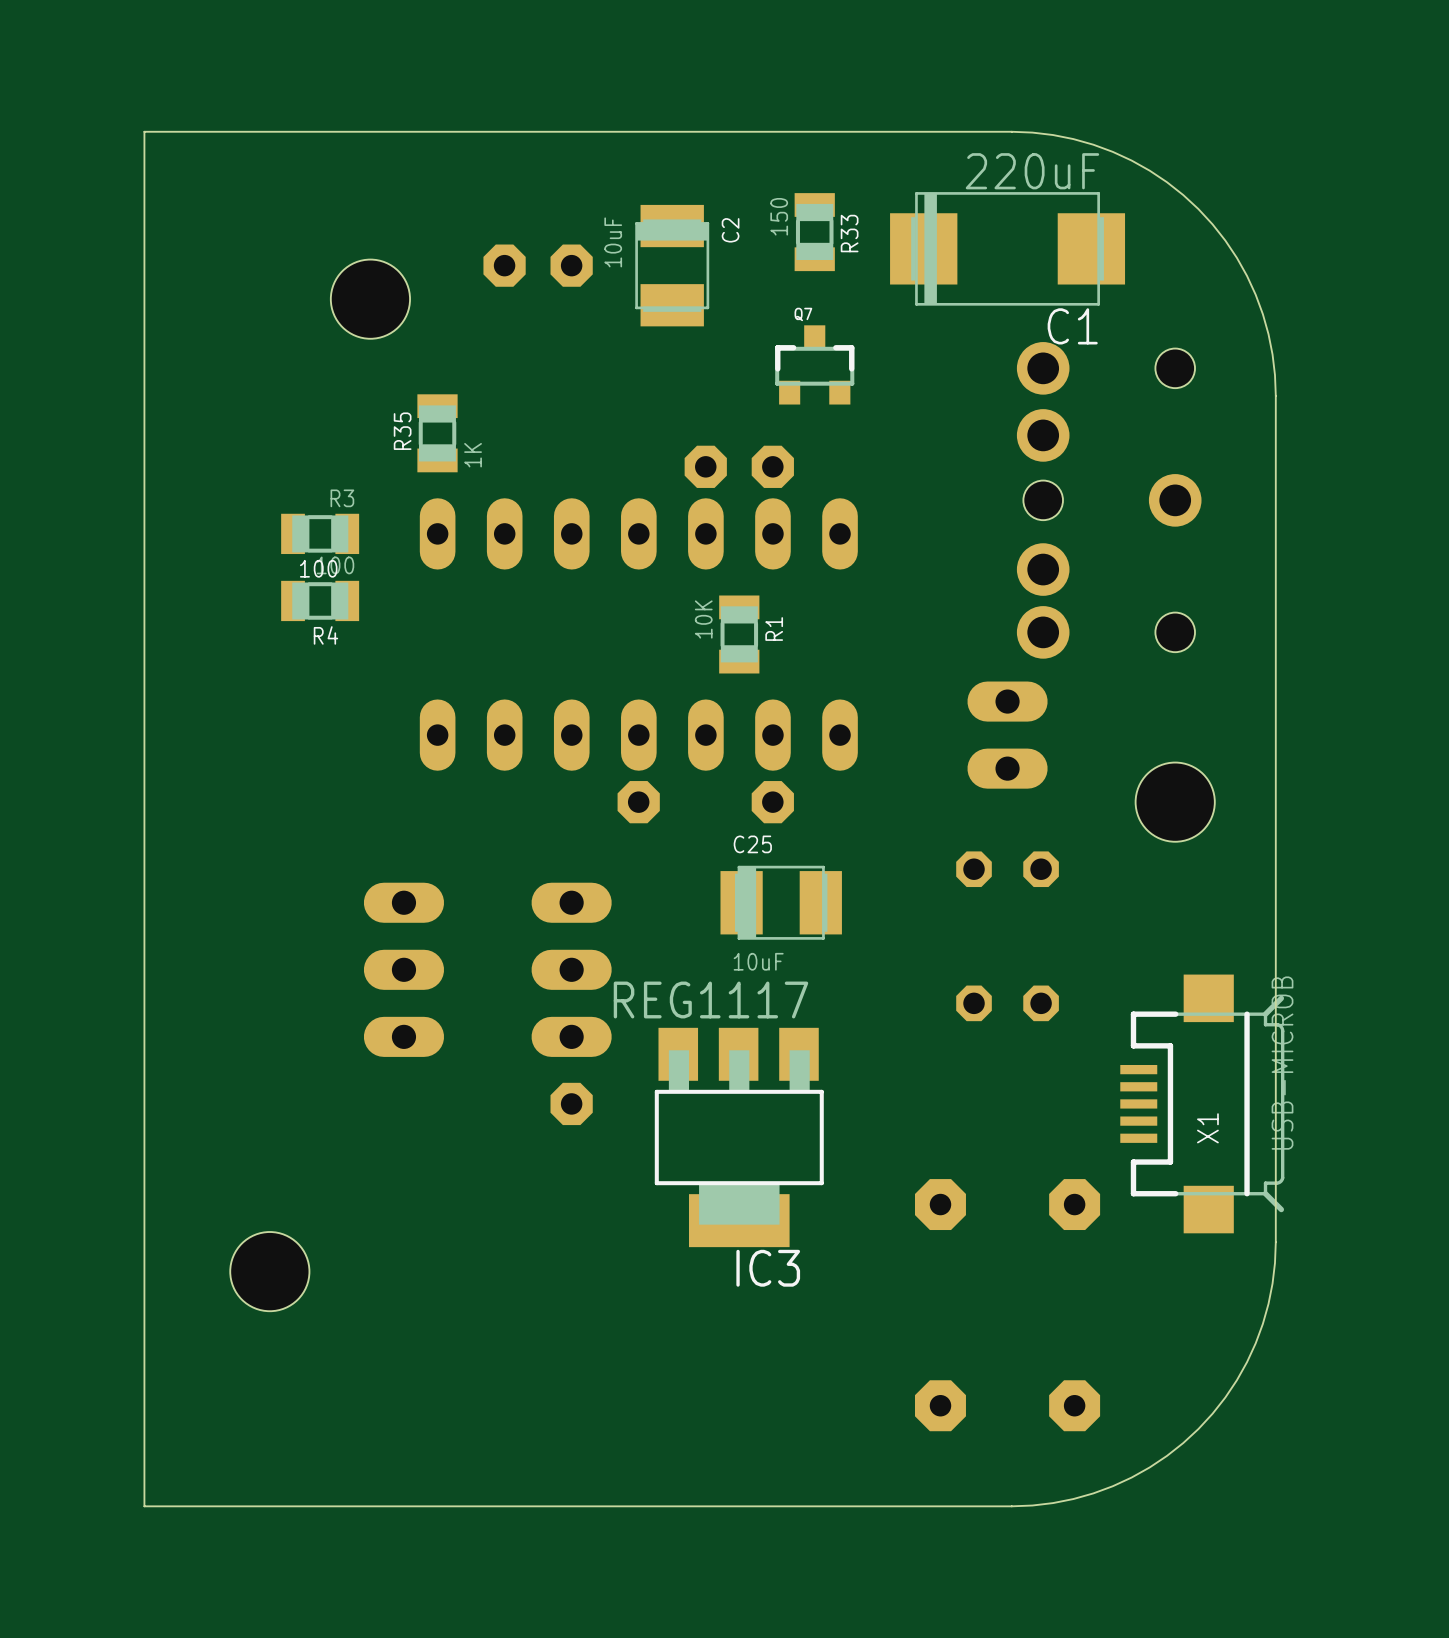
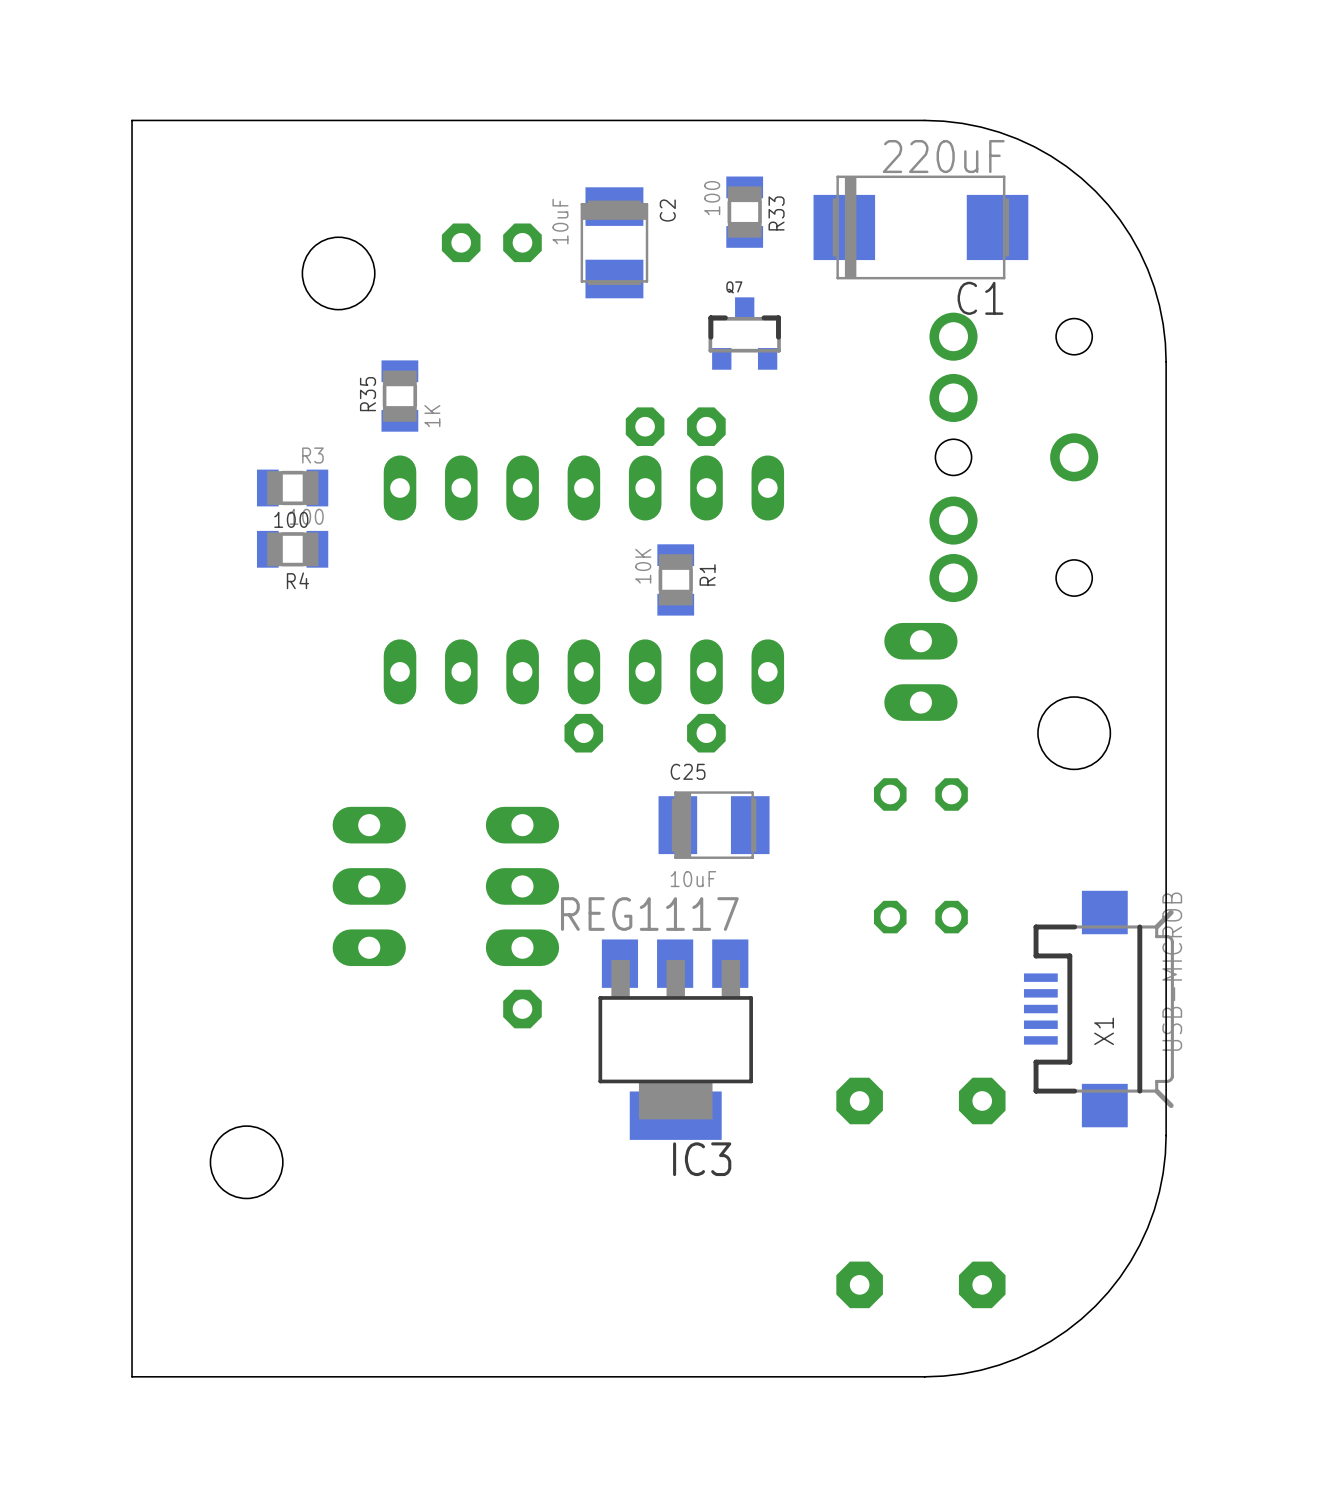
R33 value: 150 (779, 216) -> 100 (712, 198)

